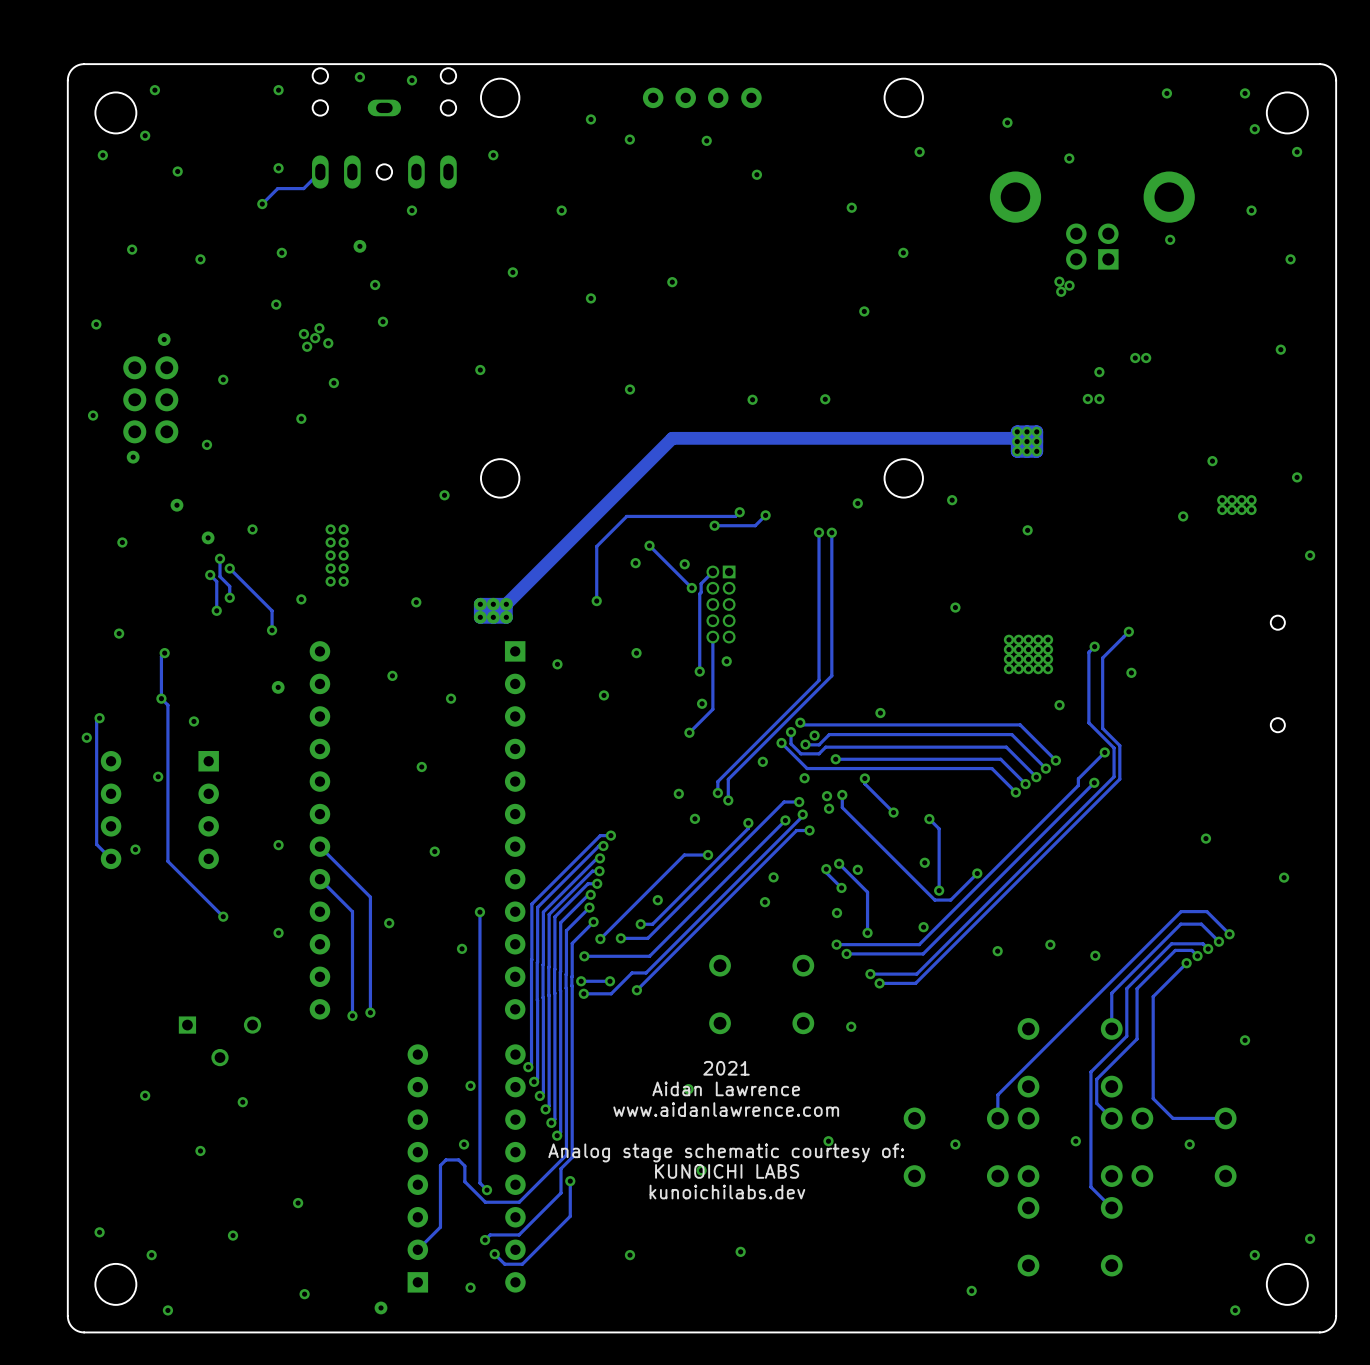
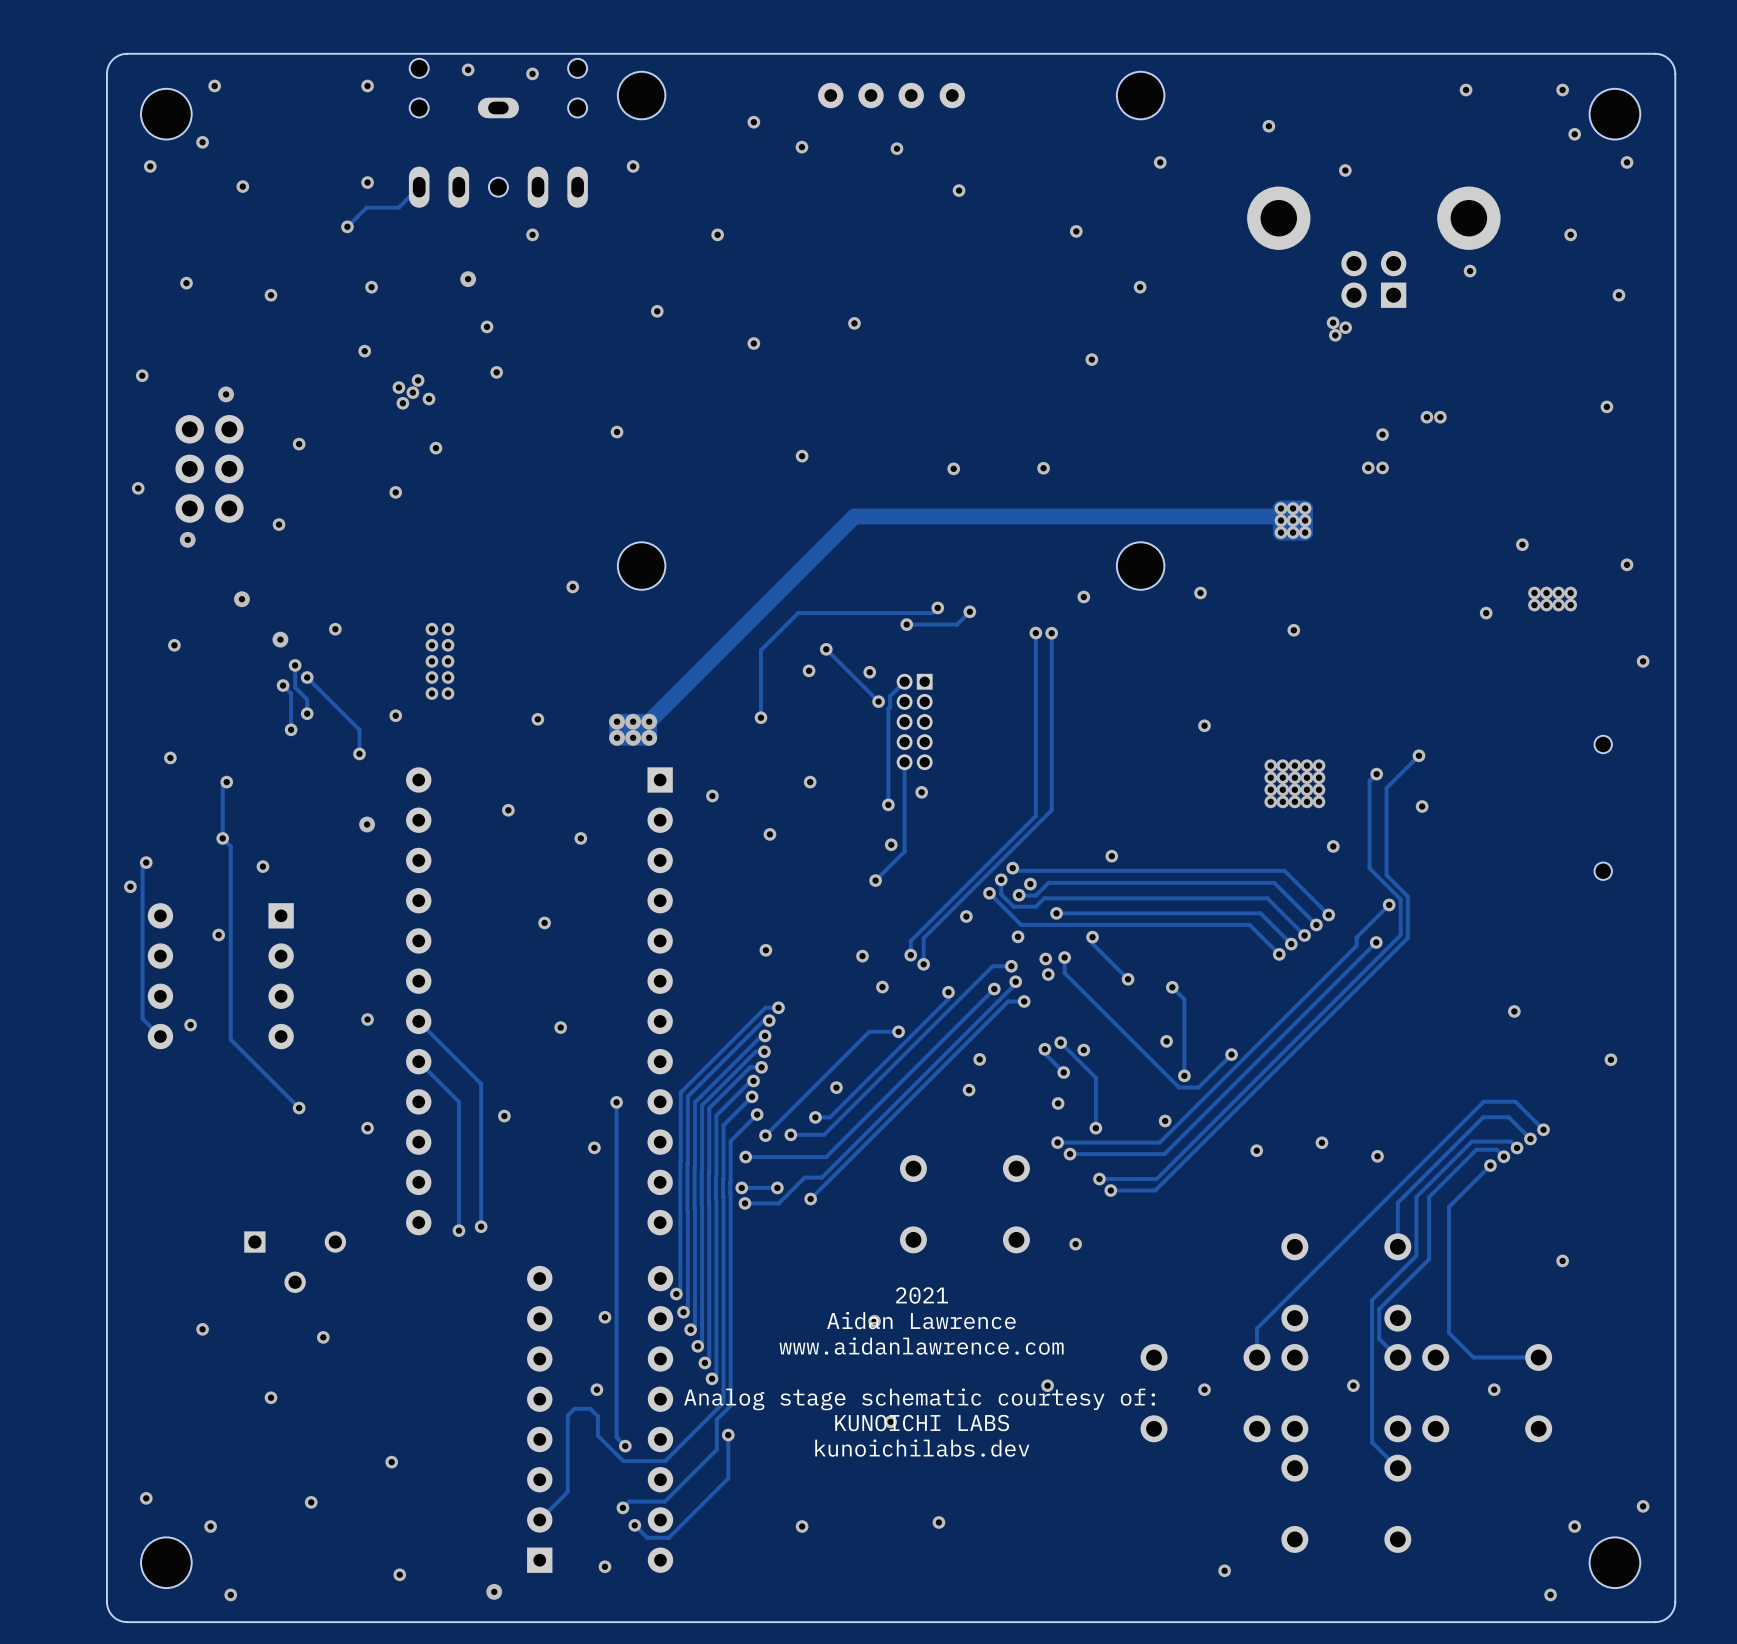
via: none -> (765, 950)

